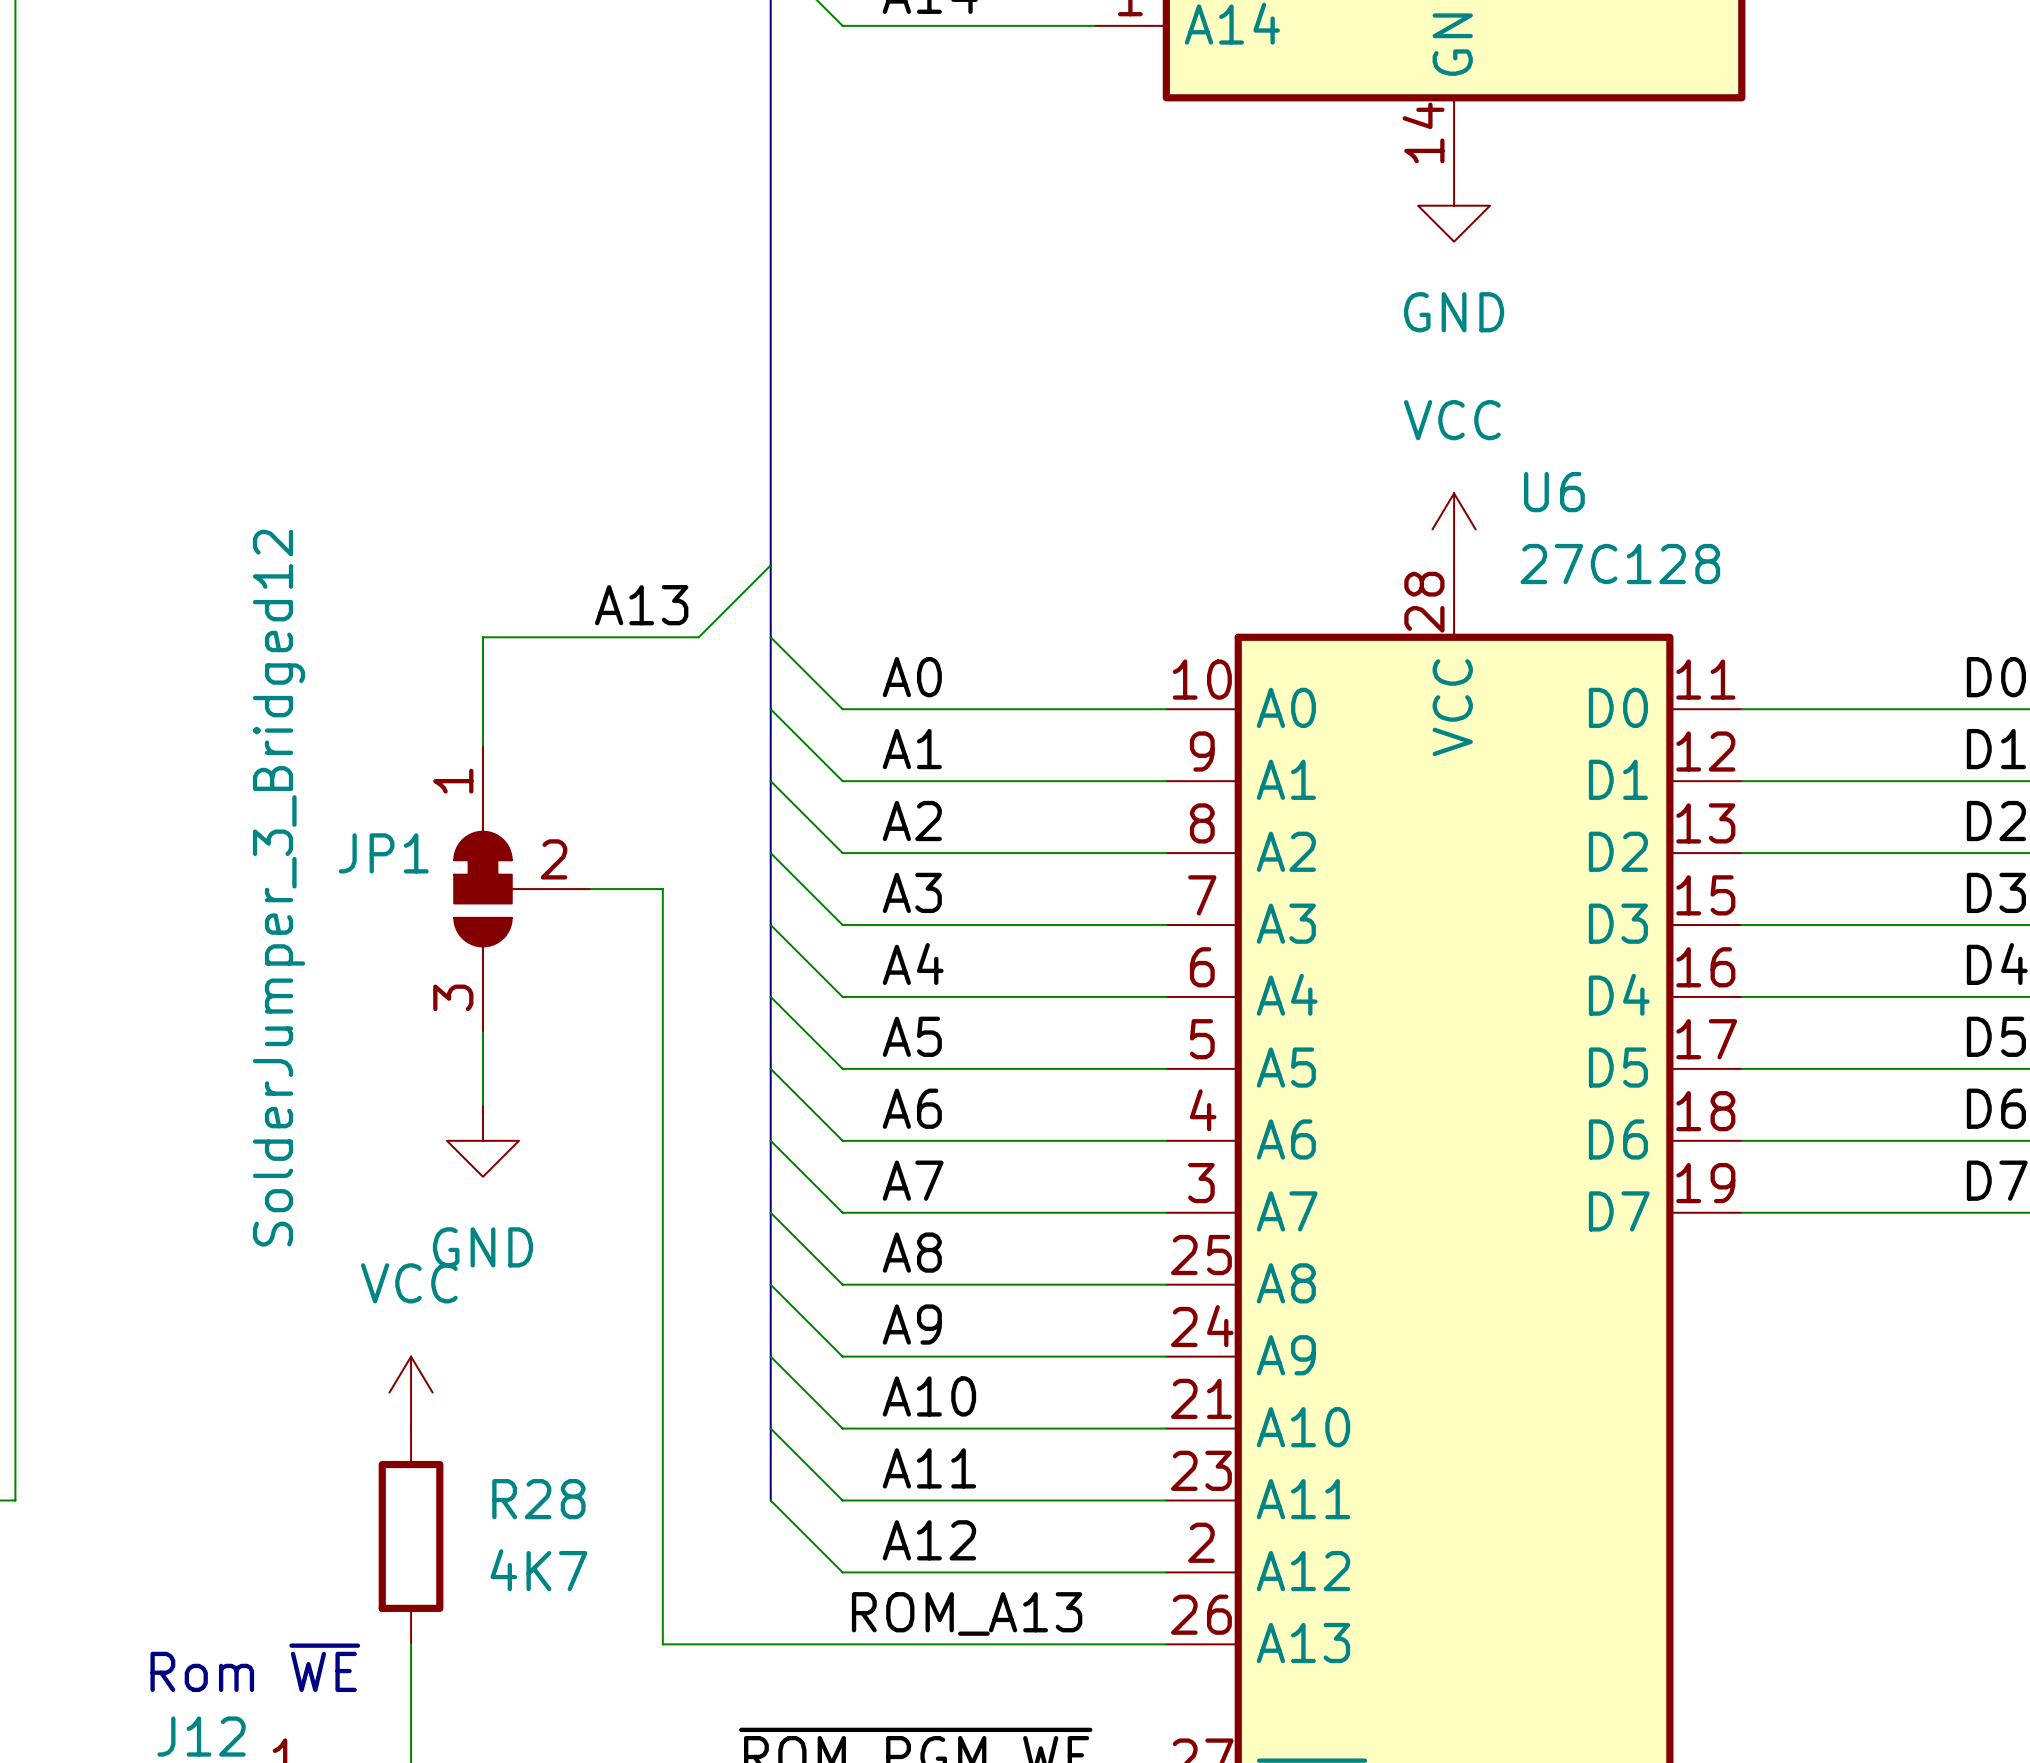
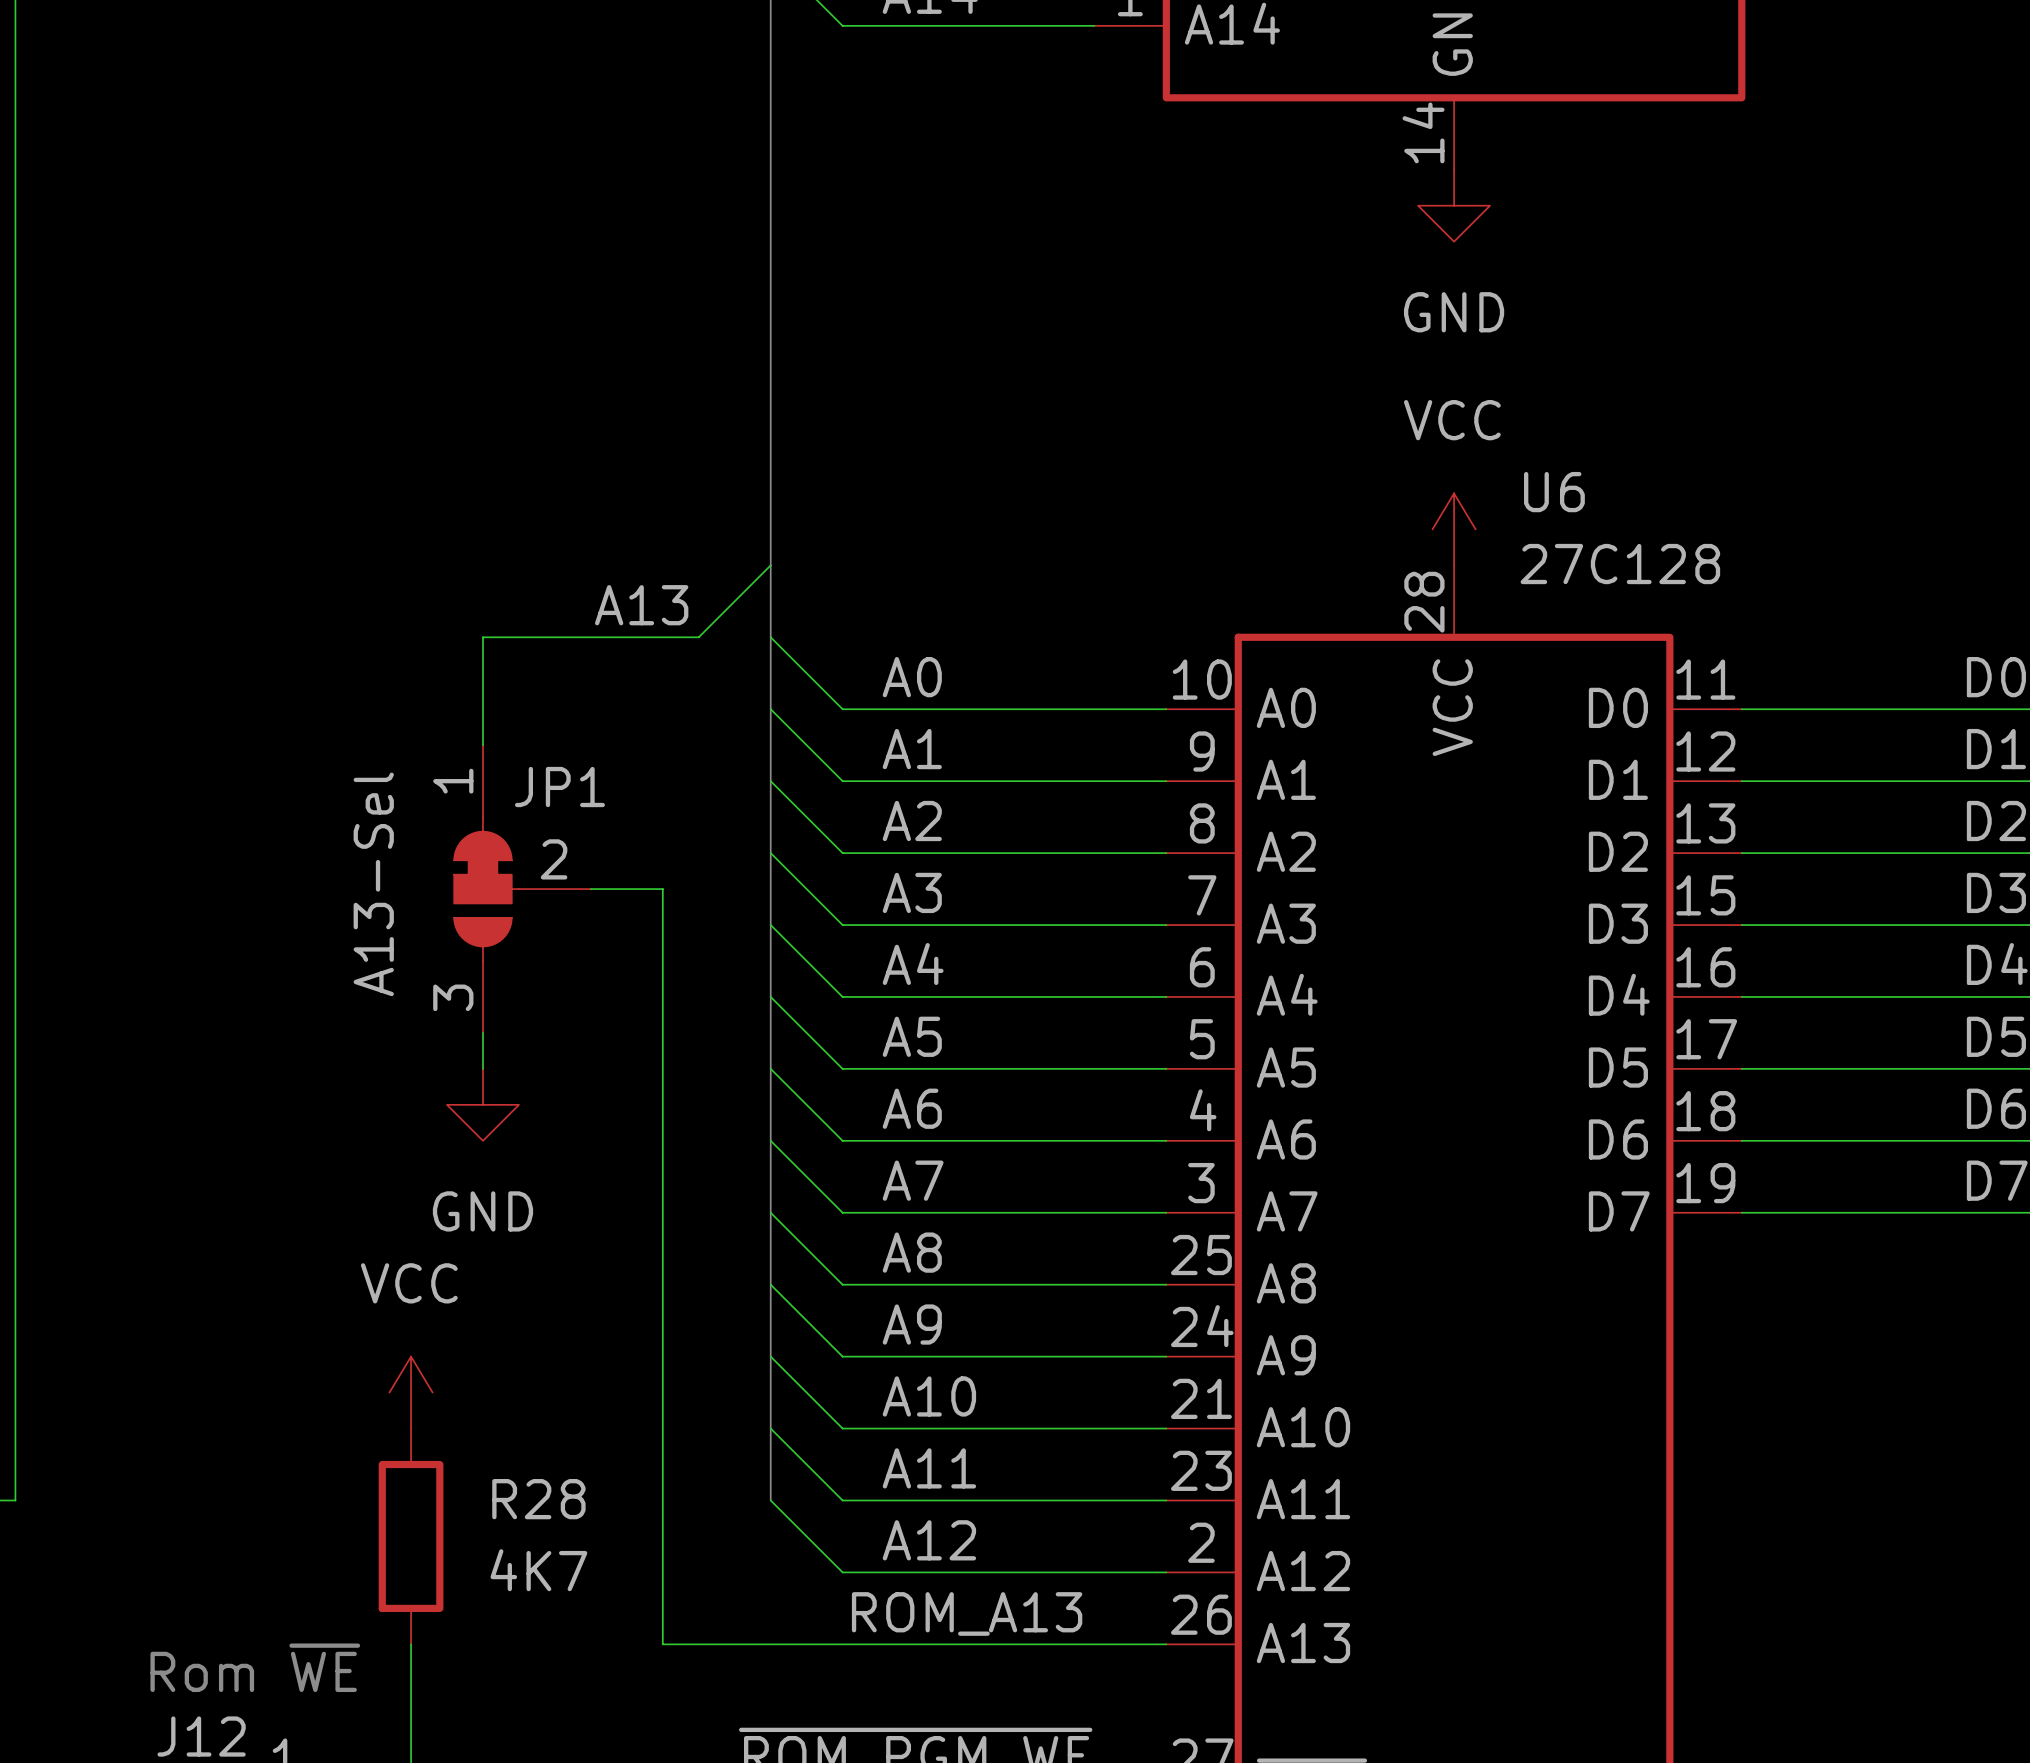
JP1 name position: JP1 (383, 853) -> JP1 (559, 787)
JP1 value: SolderJumper_3_Bridged12 (279, 888) -> A13-Sel (373, 884)
power symbol position: GND (482, 1140) -> GND (482, 1104)

